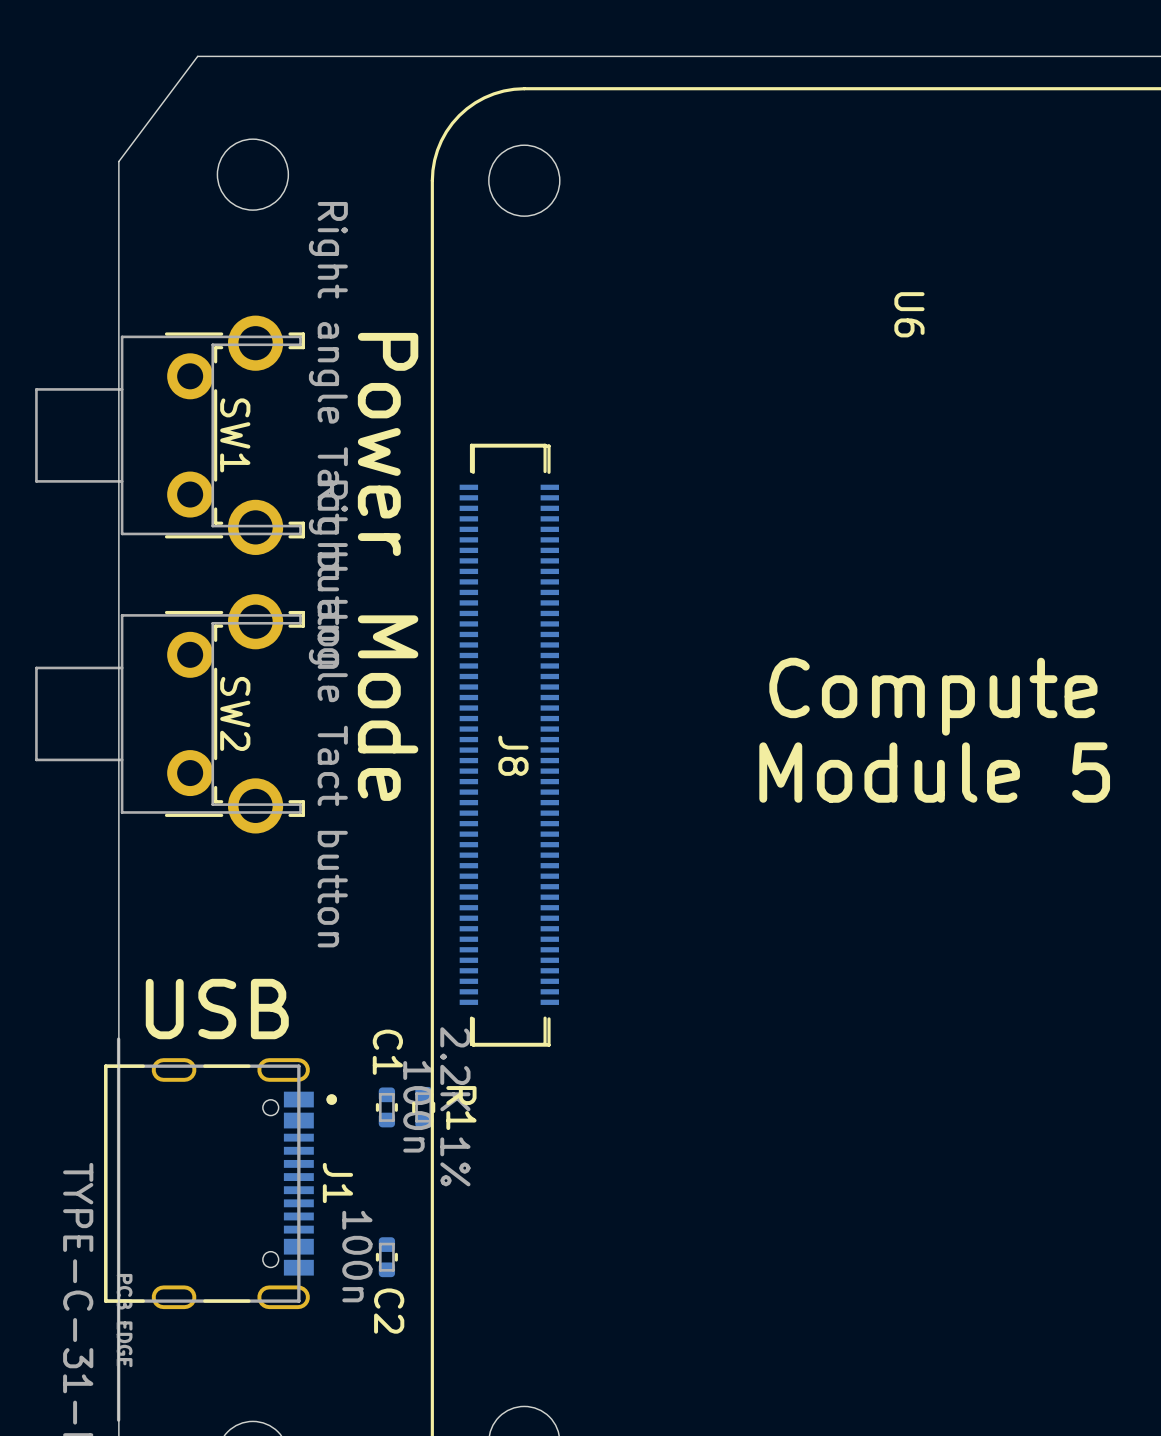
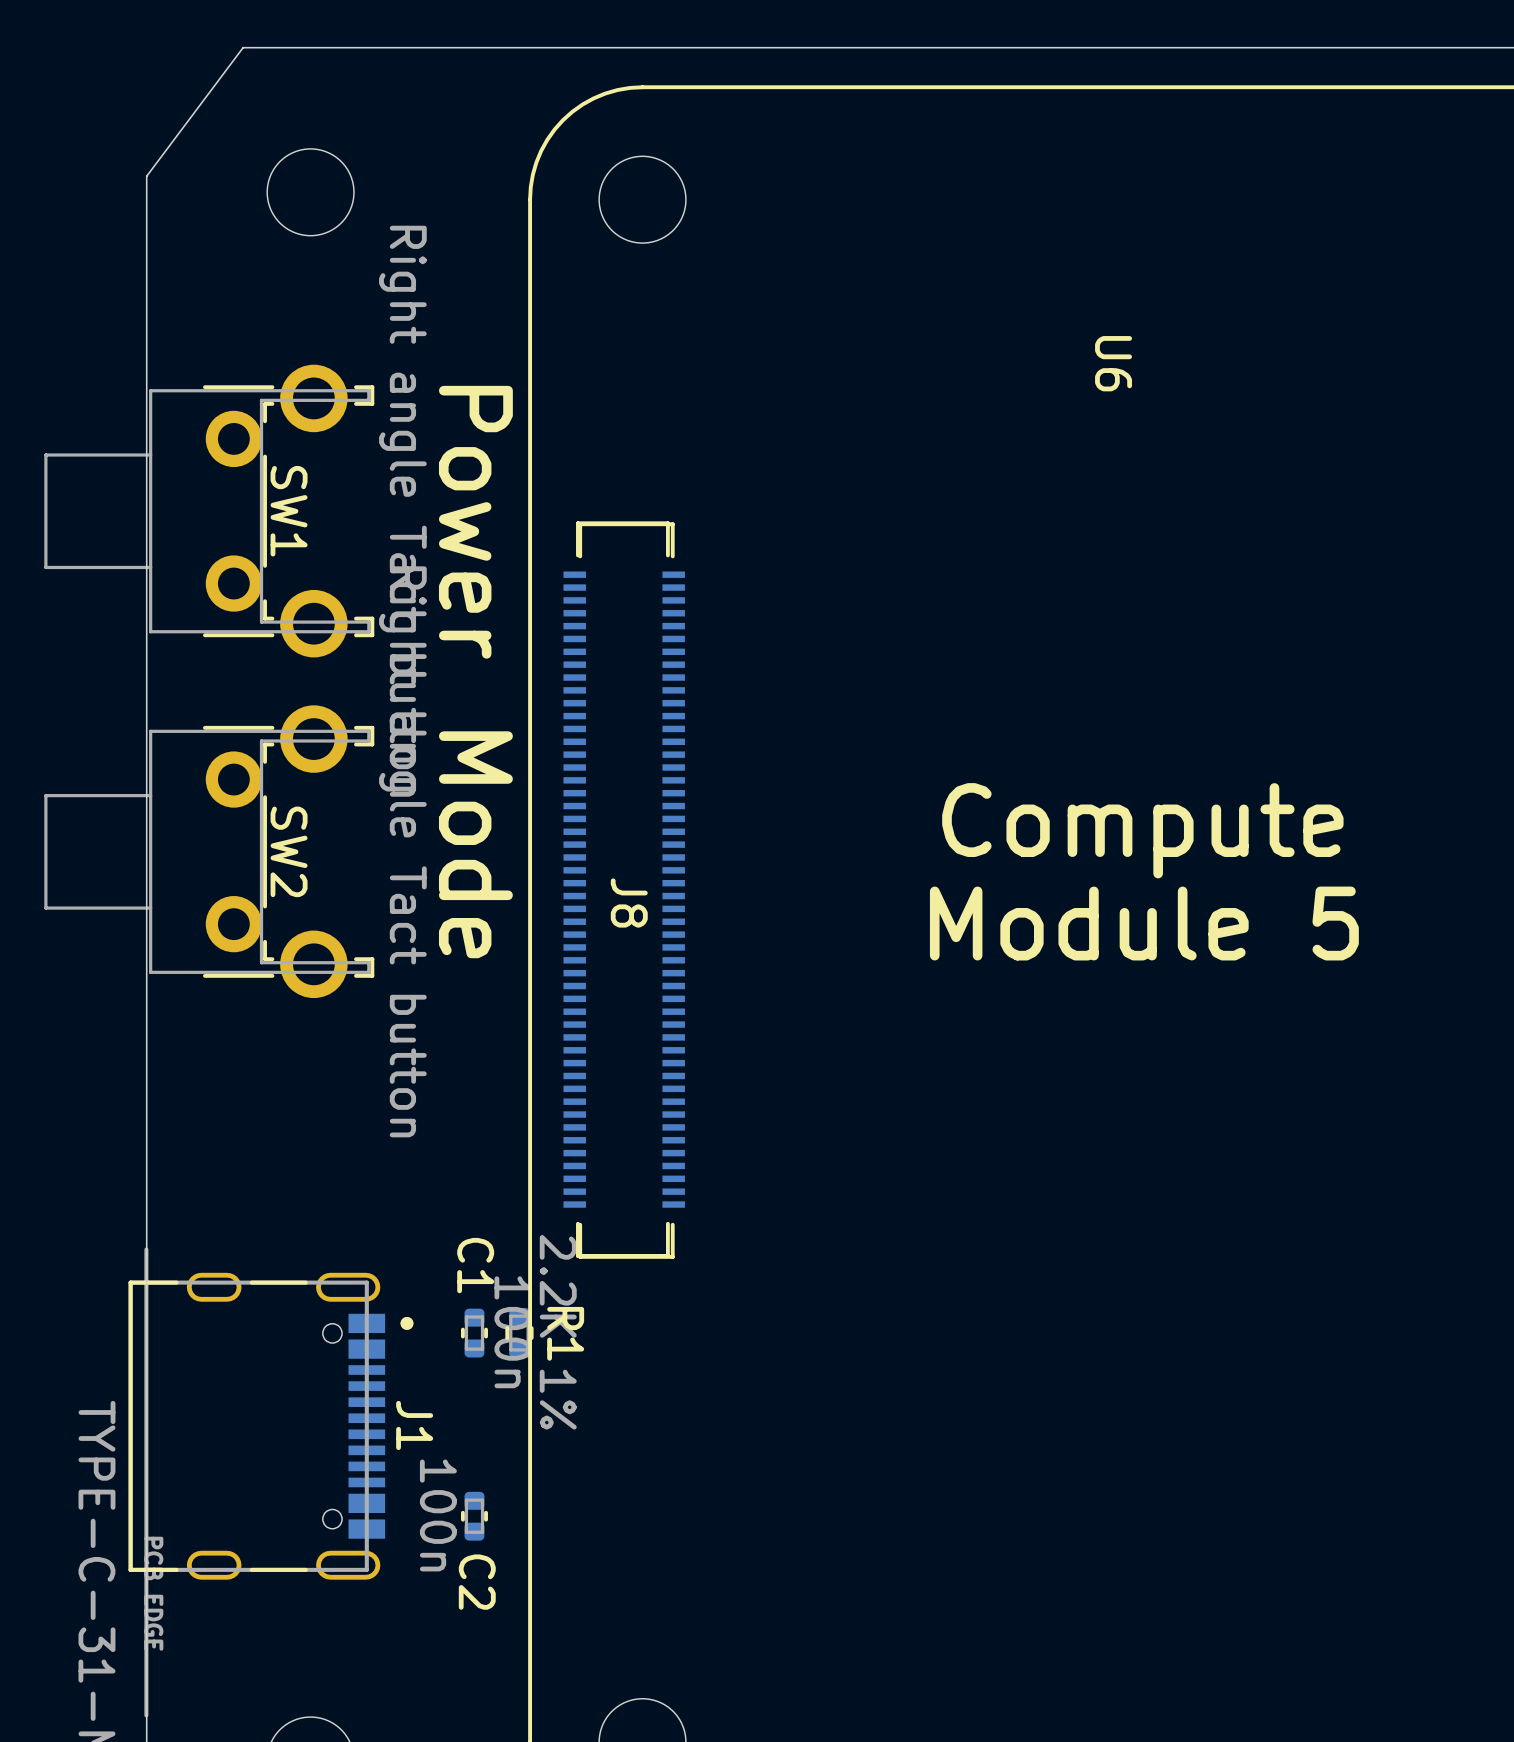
text: USB (217, 1009) -> none

